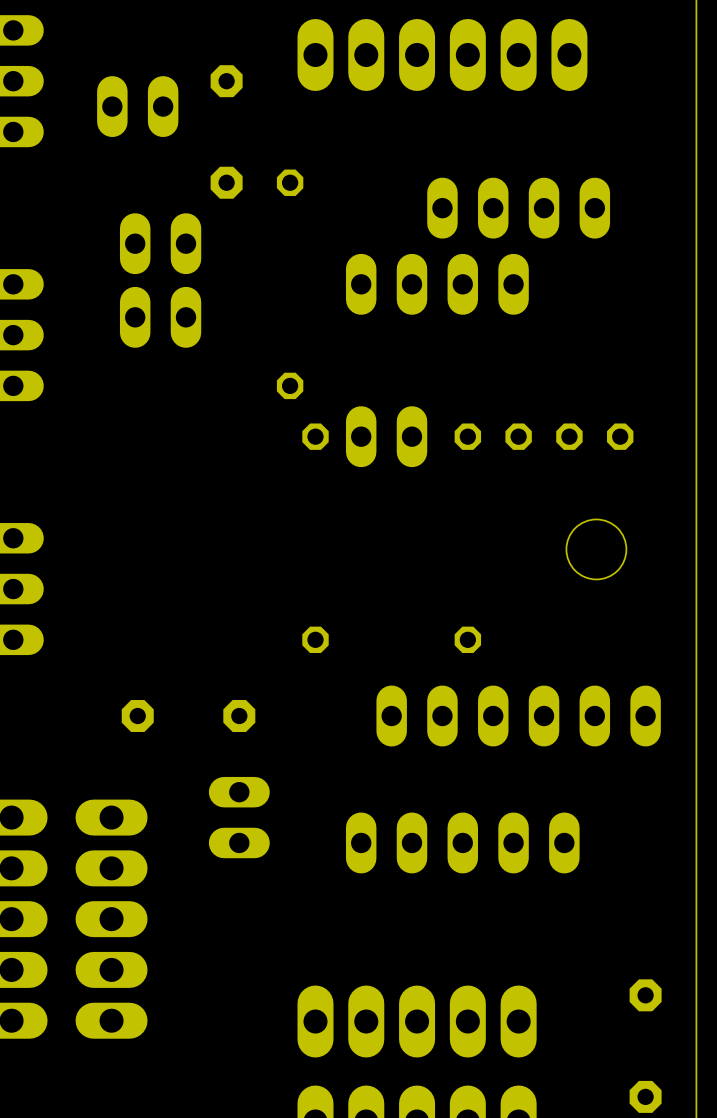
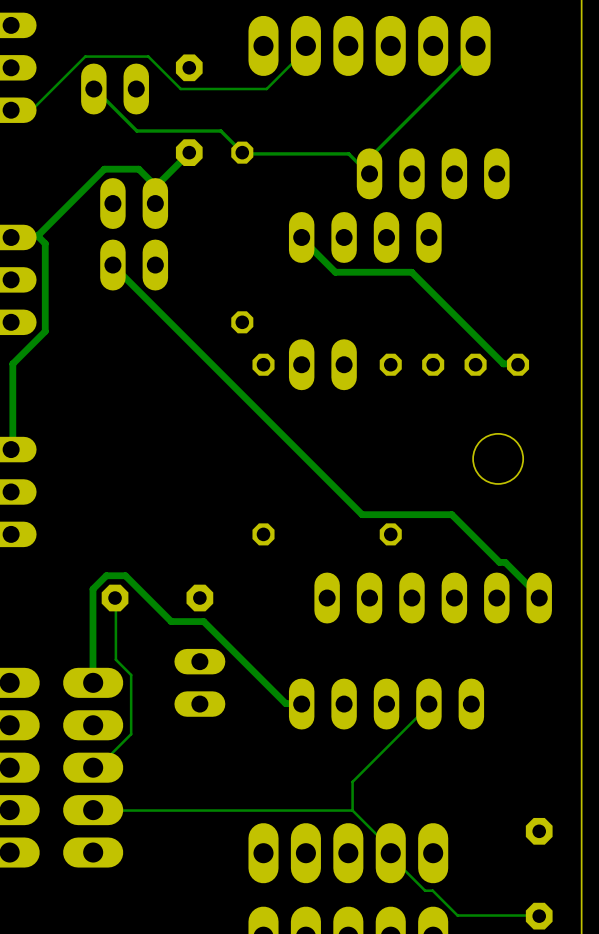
track: none -> (305, 45) (304, 50) (266, 89) (180, 89) (148, 56) (85, 56) (31, 110) (11, 110)
track: none -> (475, 45) (474, 52) (362, 165) (369, 173) (348, 153) (243, 153) (220, 131) (136, 131) (93, 89)
track: none -> (189, 152) (155, 186) (155, 203) (154, 184) (138, 169) (104, 169) (37, 235)
track: none -> (37, 235) (45, 243) (45, 331) (12, 363) (12, 447) (11, 449)
track: none -> (301, 237) (335, 272) (411, 272) (503, 363) (518, 364)
track: none -> (112, 265) (362, 514) (451, 514) (499, 562) (505, 562) (539, 598)
track: none -> (115, 598) (115, 659) (131, 675) (131, 734) (98, 766) (93, 767)
track: none -> (92, 682) (92, 589) (106, 575) (125, 575) (171, 621) (203, 621) (285, 703) (301, 704)
track: none -> (428, 704) (352, 781) (352, 810)
track: none -> (93, 810) (352, 810)
track: none -> (352, 810) (390, 848) (390, 856) (425, 890) (432, 890) (457, 915) (539, 916)

